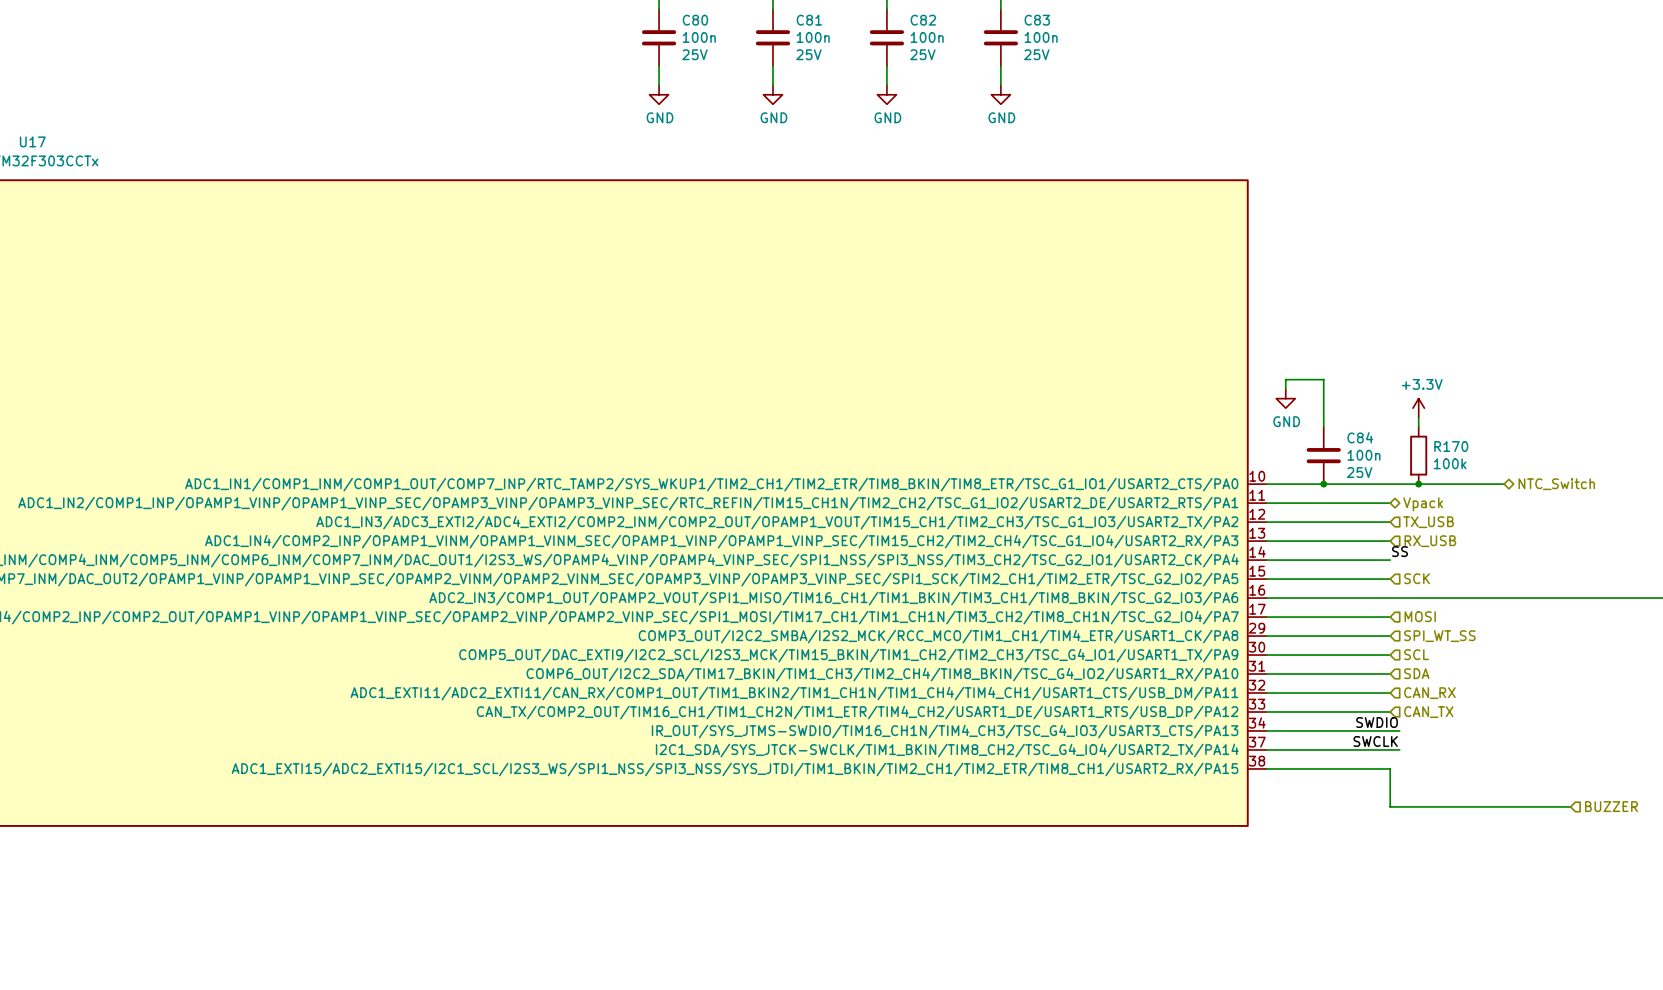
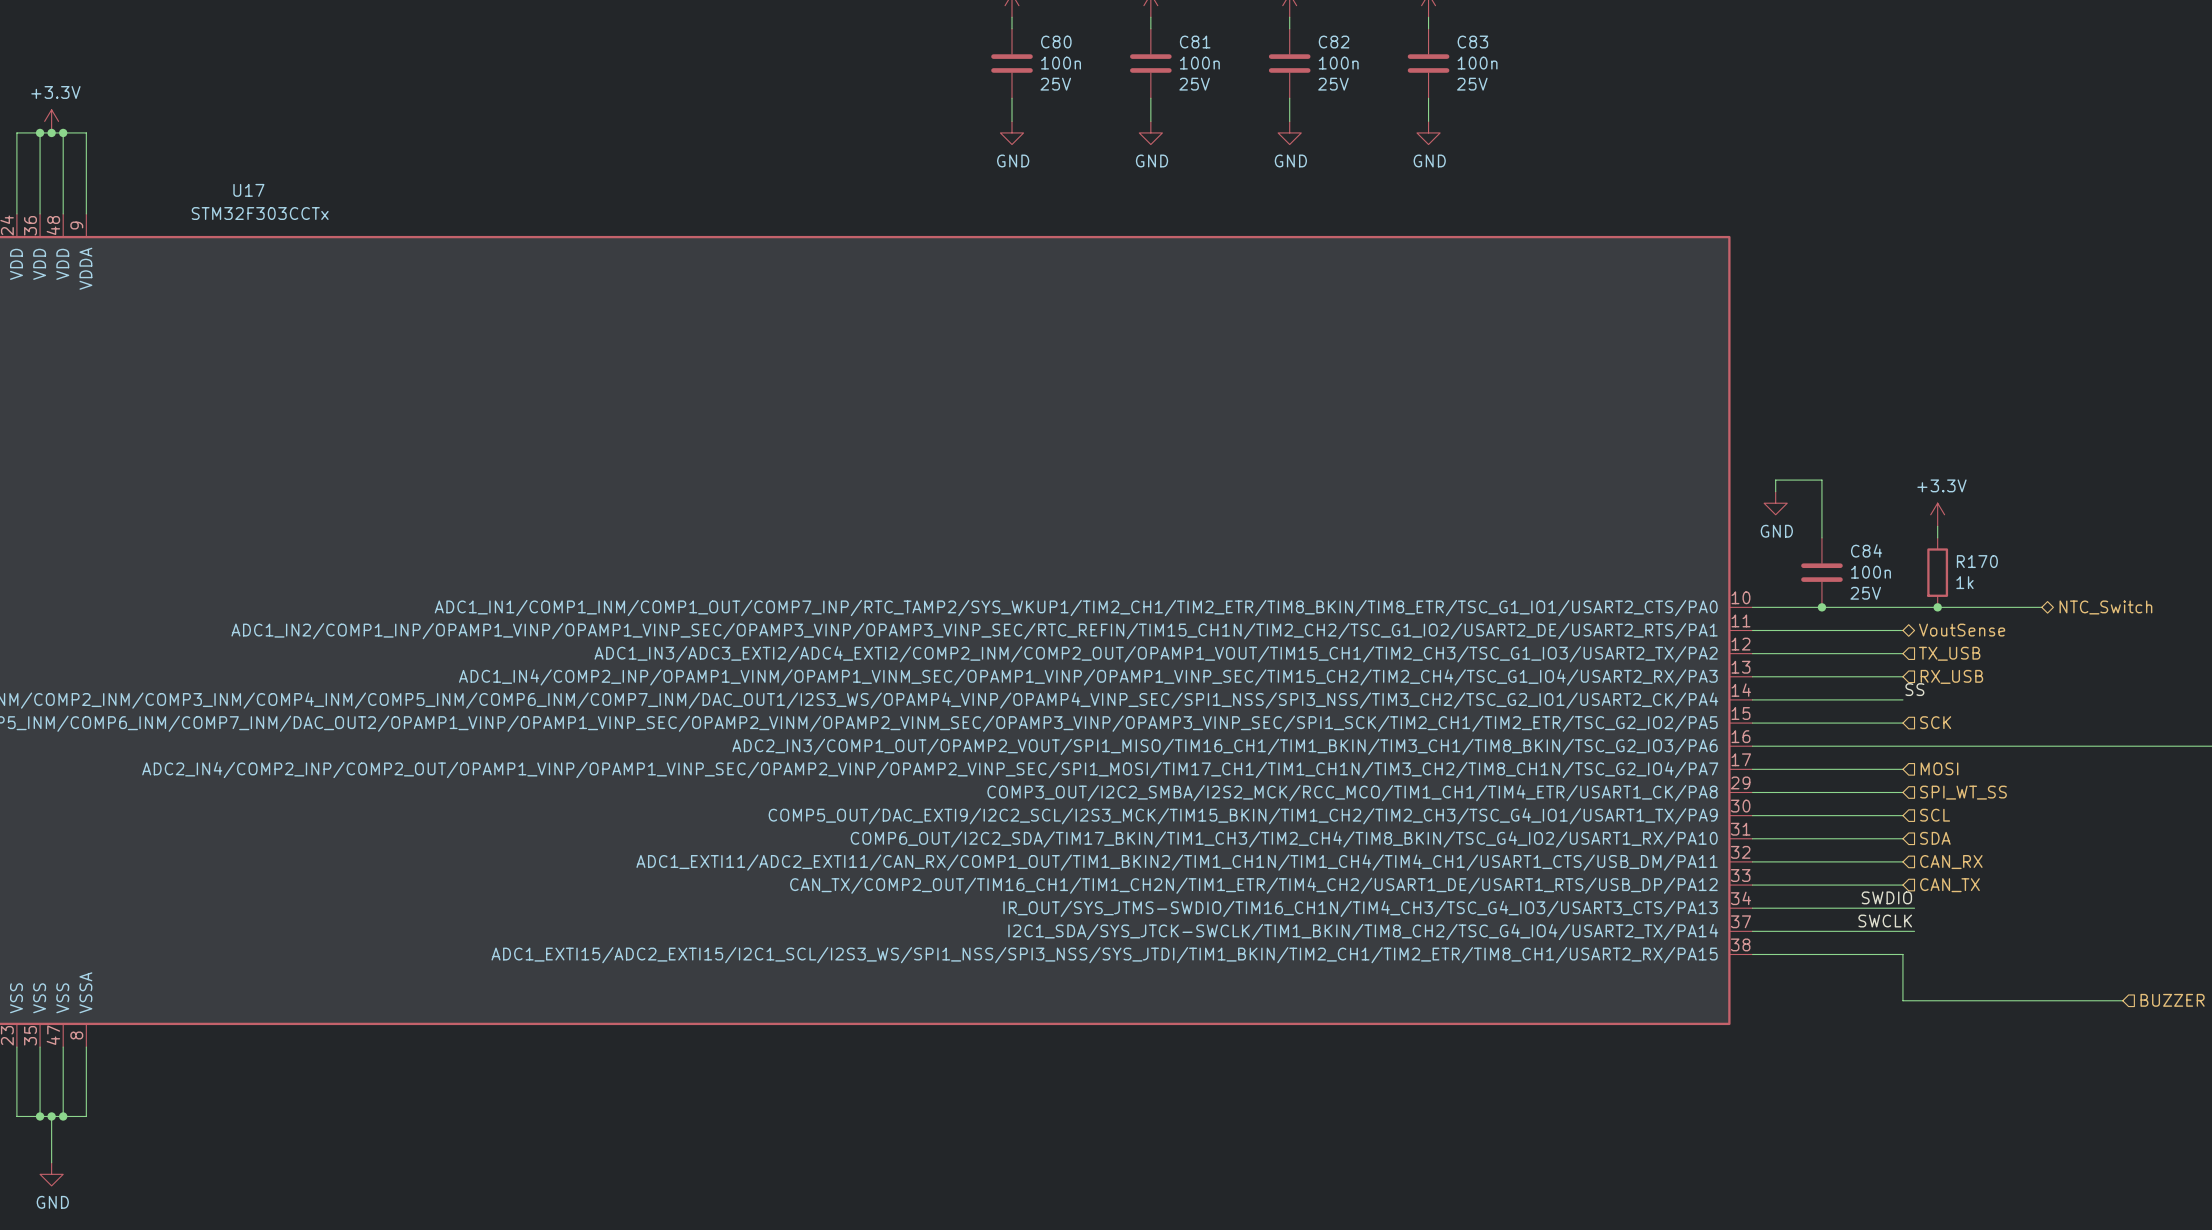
R170 value: 100k (1450, 463) -> 1k (1964, 582)
hierarchical label: Vpack (1423, 504) -> VoutSense (1962, 630)

